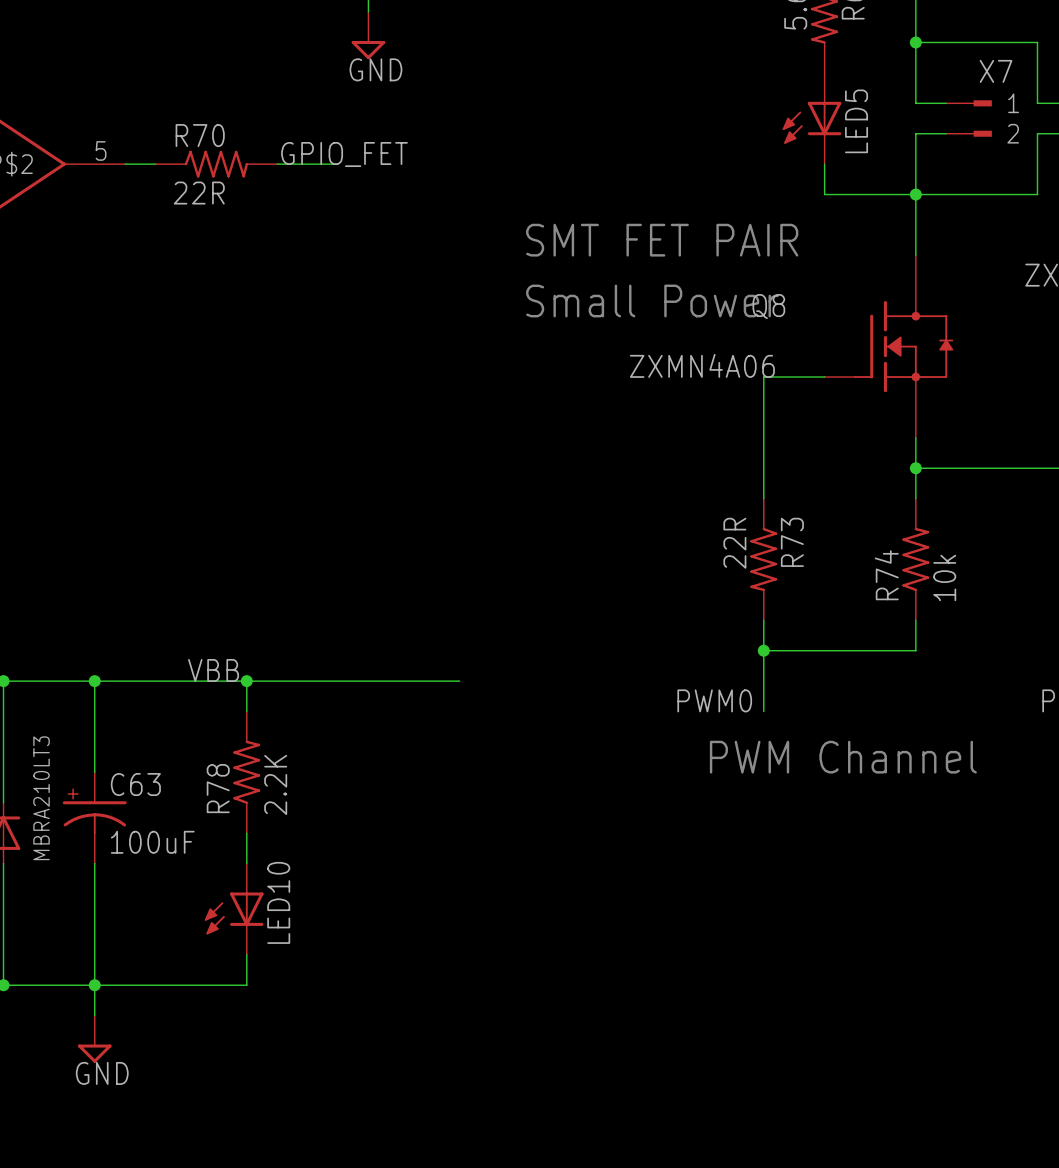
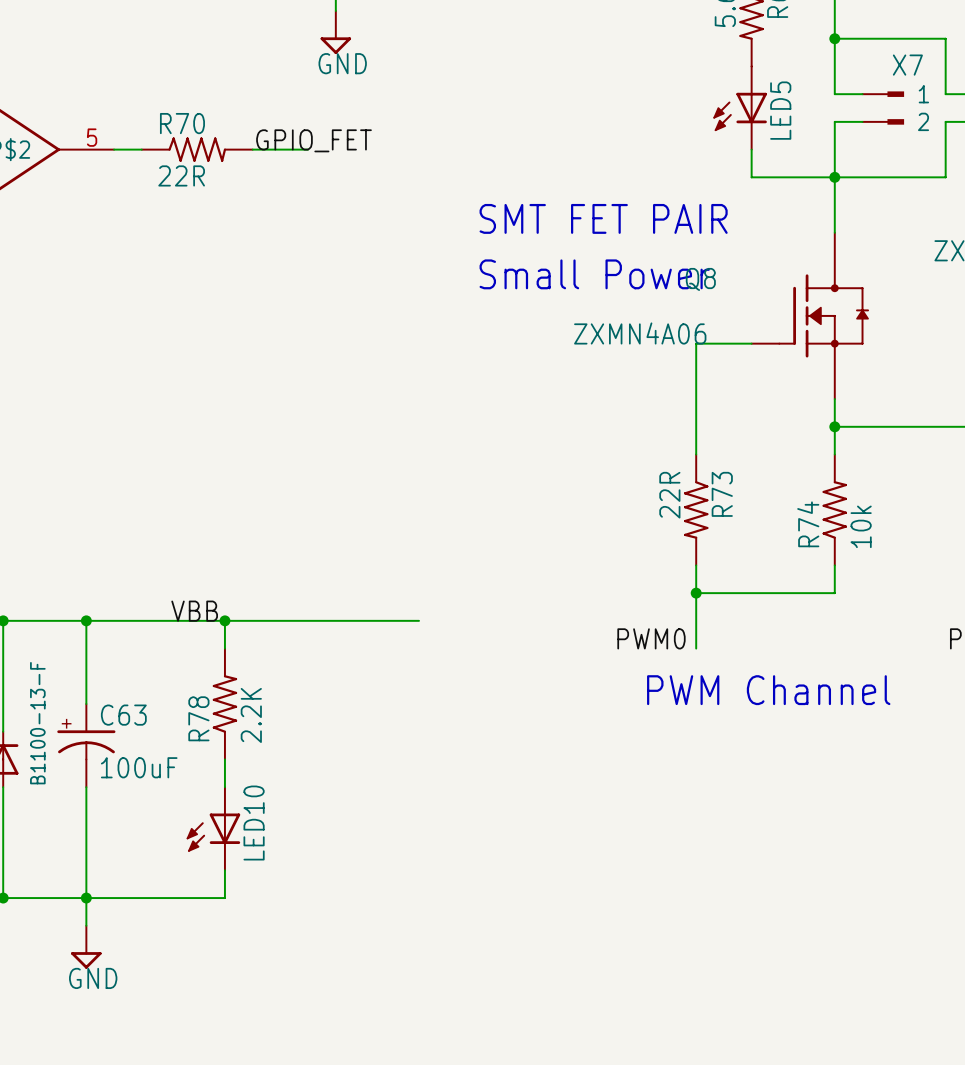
part value: MBRA210LT3 (41, 798) -> B1100-13-F (37, 723)

